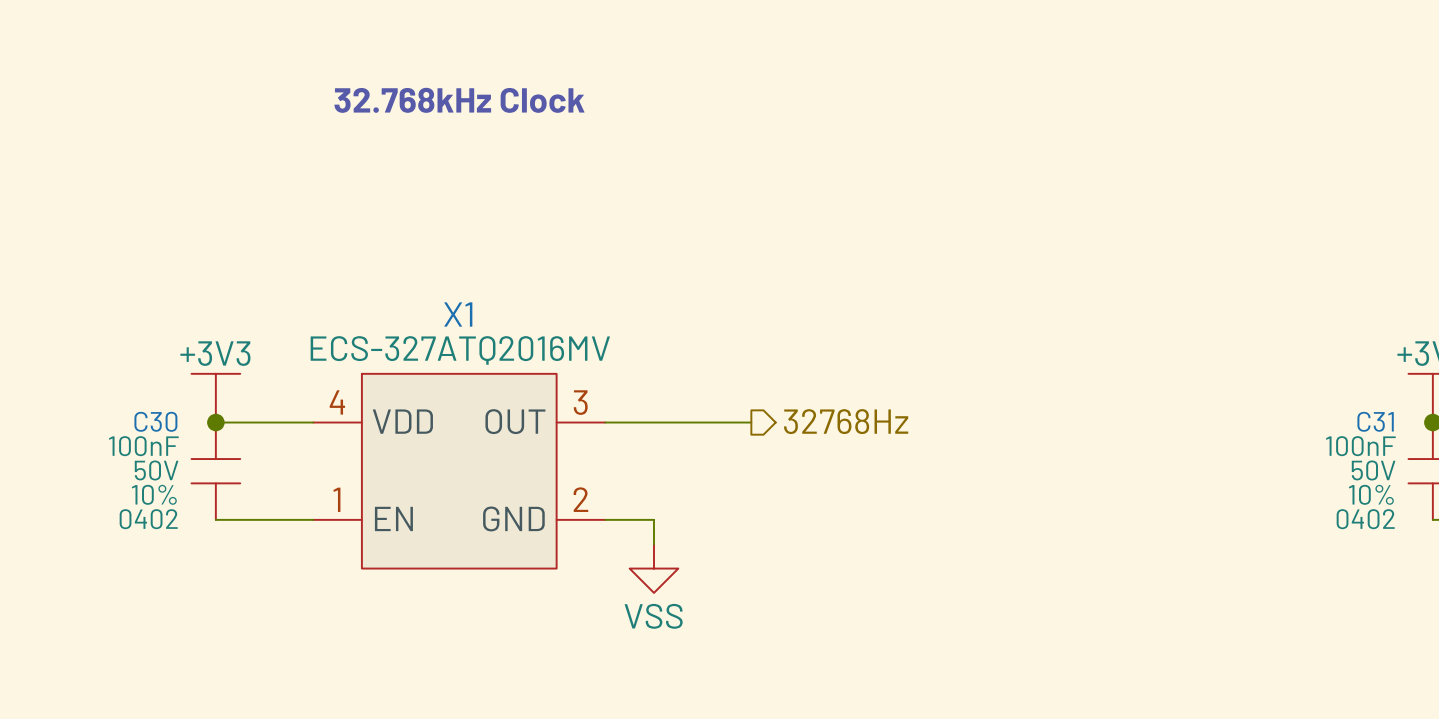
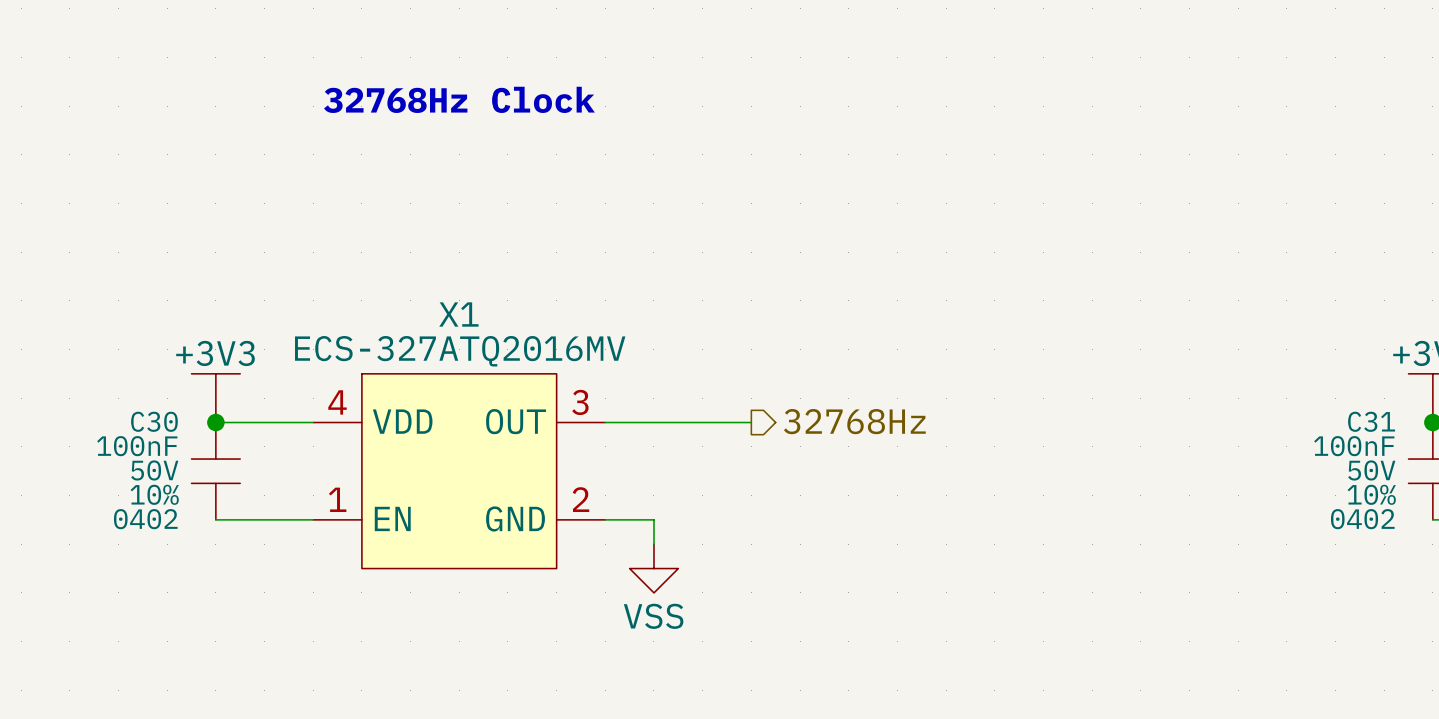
text: 32.768kHz Clock (459, 100) -> 32768Hz Clock (459, 99)

